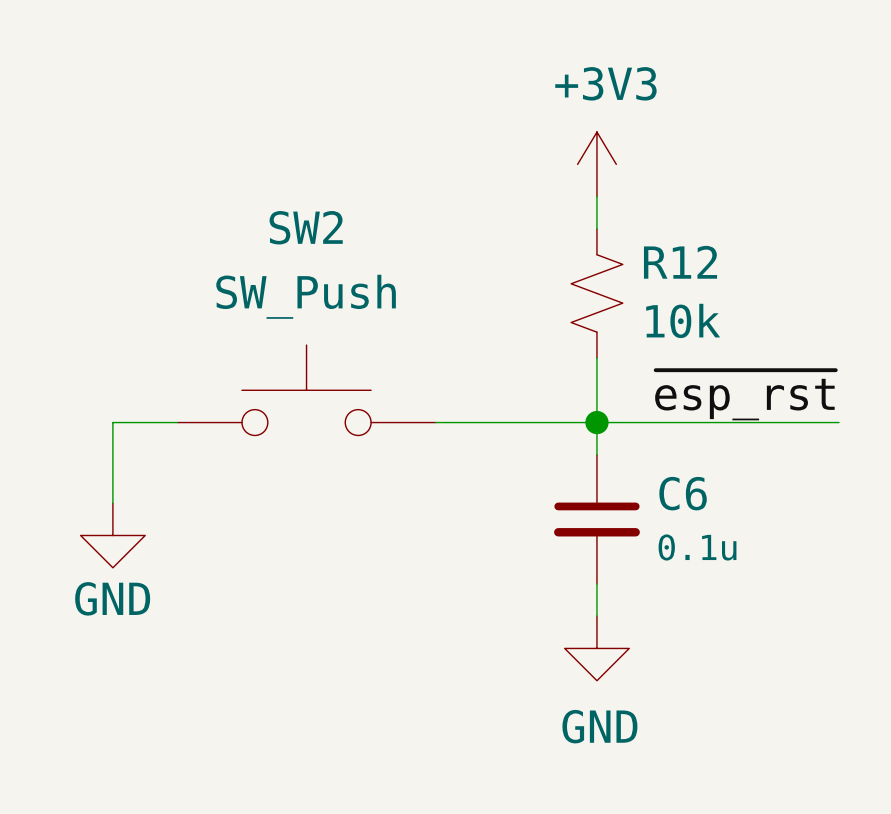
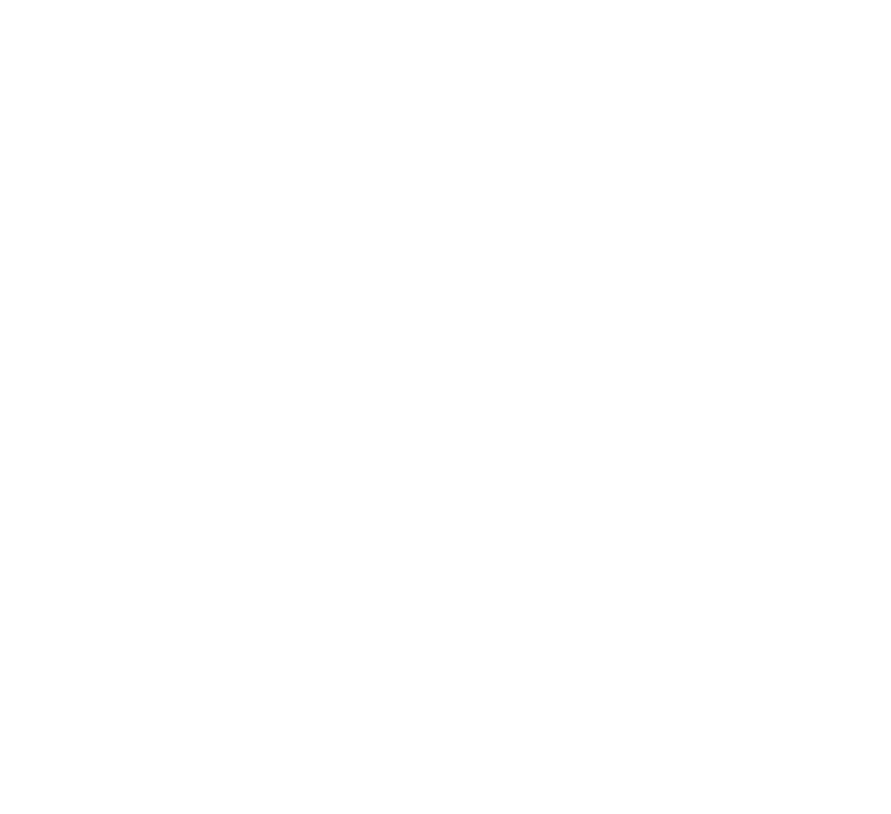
power symbol: +3V3 (596, 164) -> none
wire: (596, 196) (596, 228) -> none
R12: 10k (596, 293) -> none
wire: (596, 358) (596, 454) -> none
SW2: SW_Push (306, 390) -> none
label: ~{esp_rst} (745, 395) -> none
wire: (177, 422) (112, 422) (112, 503) -> none
wire: (435, 422) (839, 422) -> none
junction: (596, 422) -> none
C6: 0.1u (596, 519) -> none
power symbol: GND (112, 535) -> none
wire: (596, 583) (596, 616) -> none
power symbol: GND (596, 648) -> none

